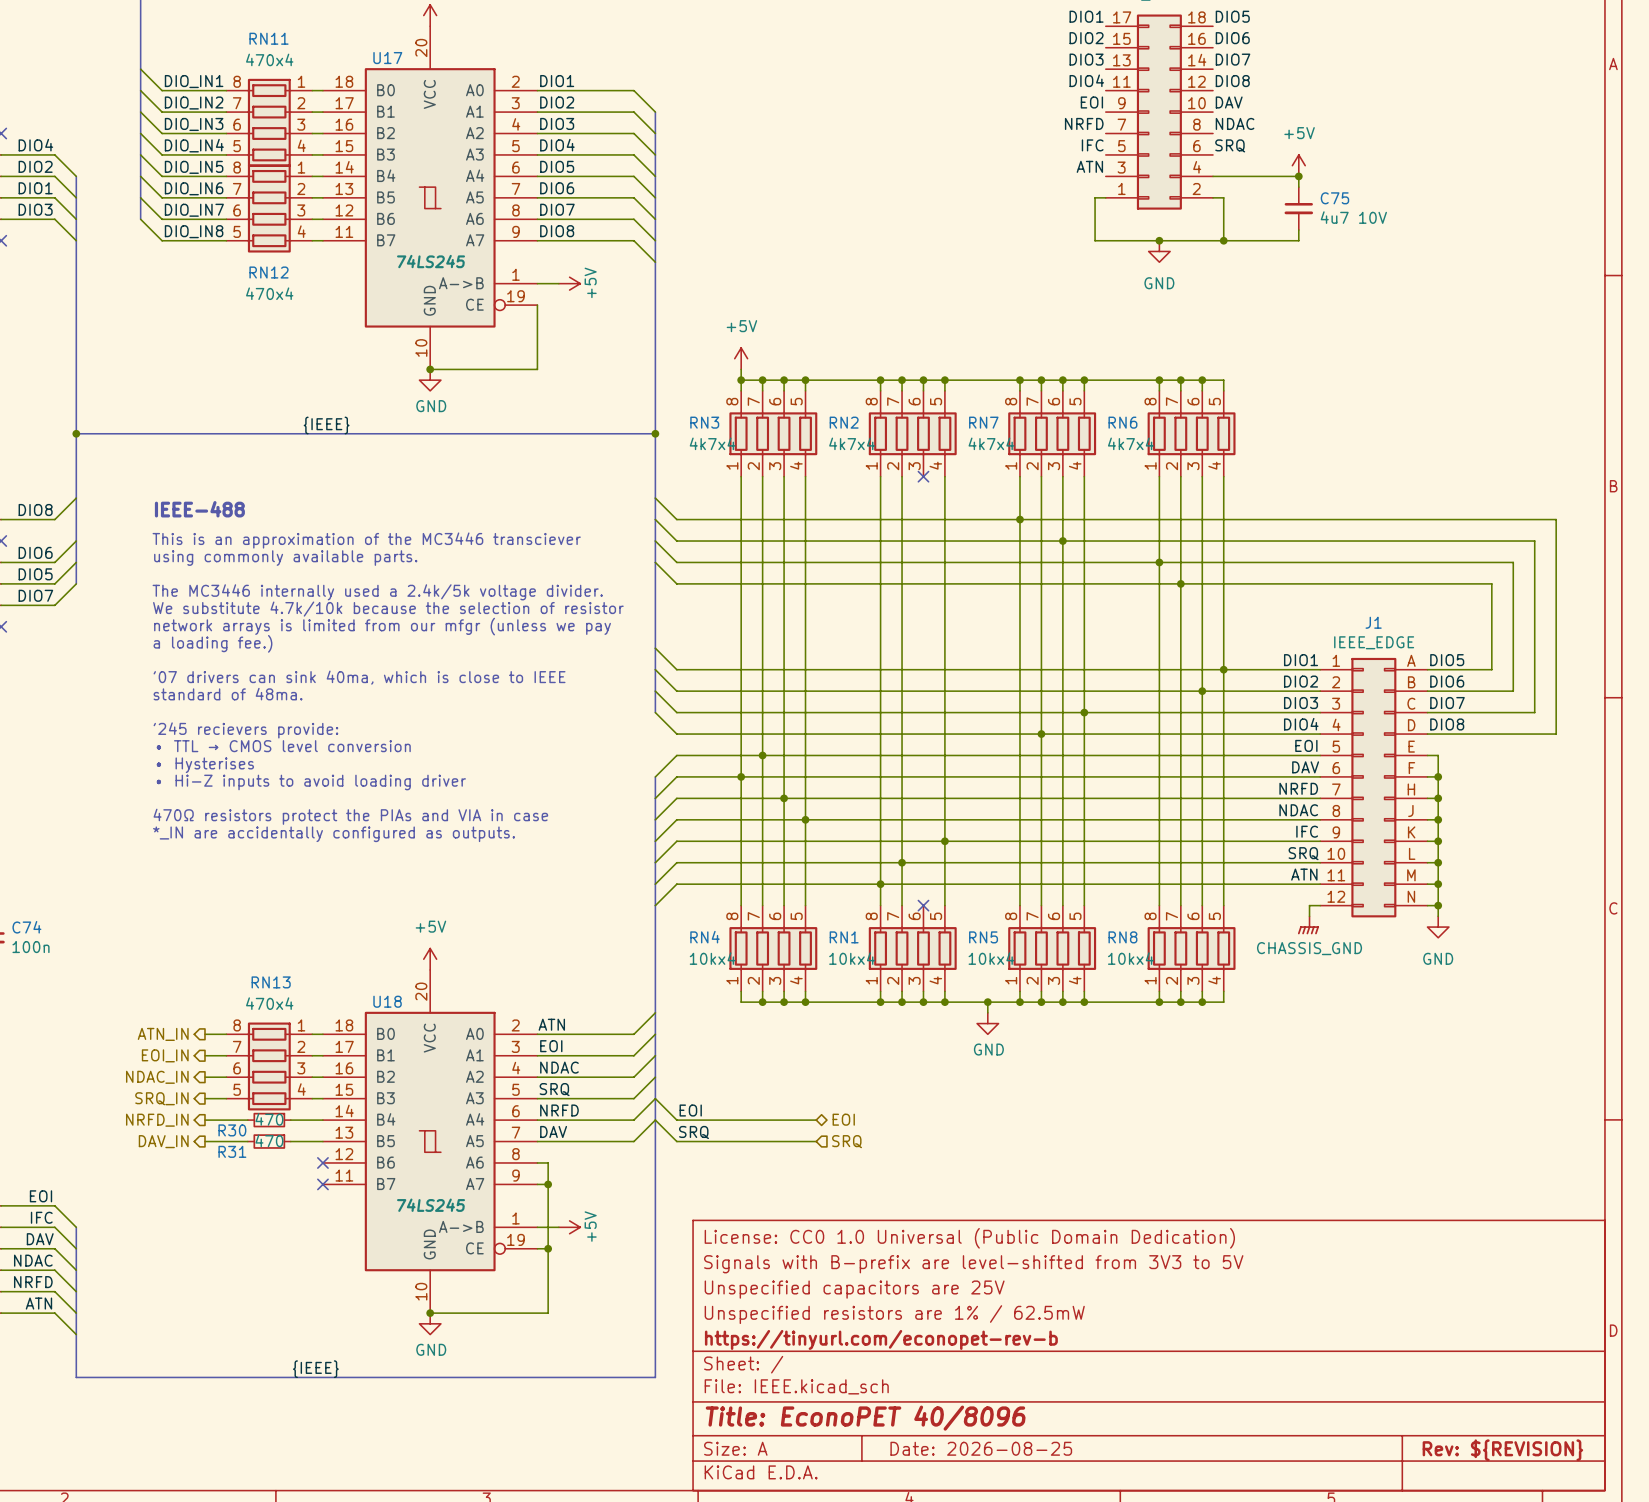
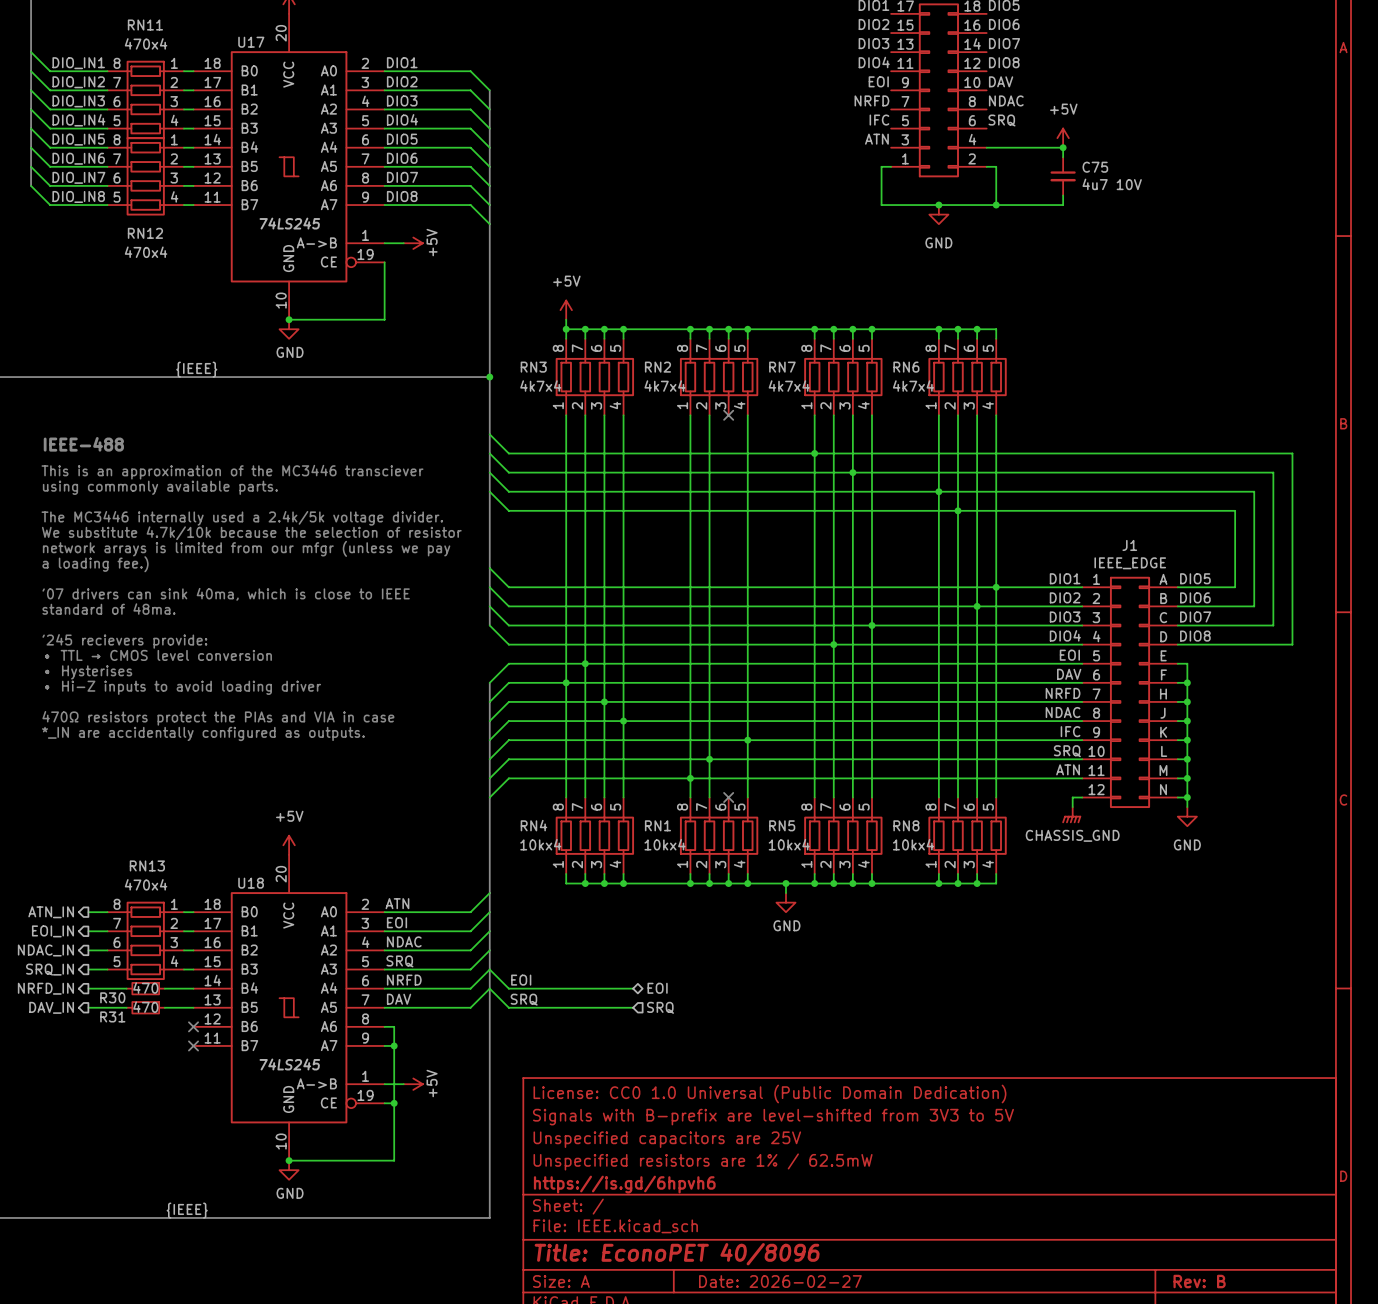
title block: https://tinyurl.com/econopet-rev-b (881, 1339) -> https://is.gd/6hpvh6 (624, 1184)
title block: Date: 2026-08-25 (981, 1448) -> Date: 2026-02-27 (780, 1281)
title block: Rev: ${REVISION} (1502, 1450) -> Rev: B (1199, 1281)

